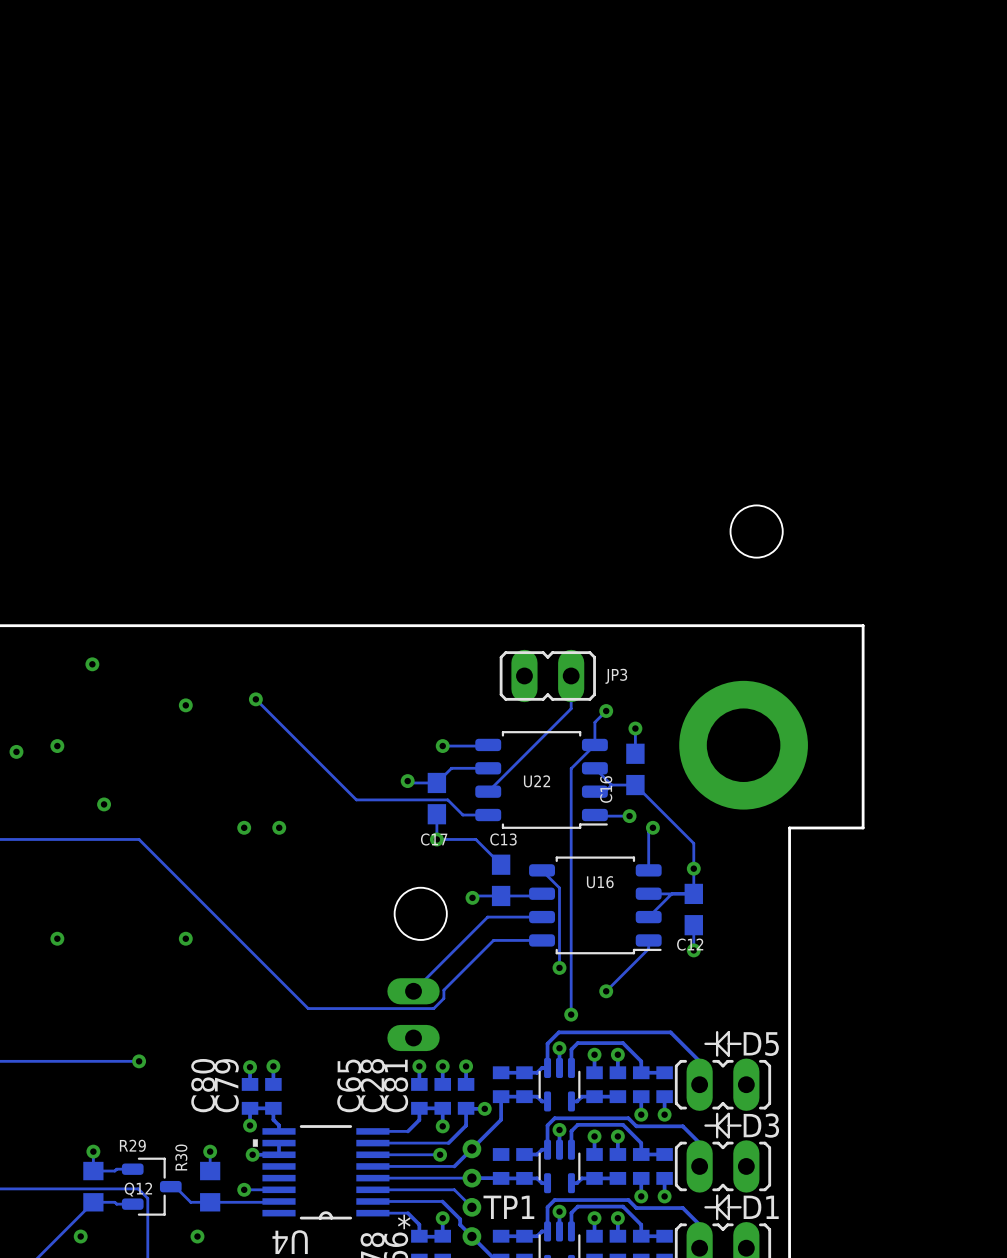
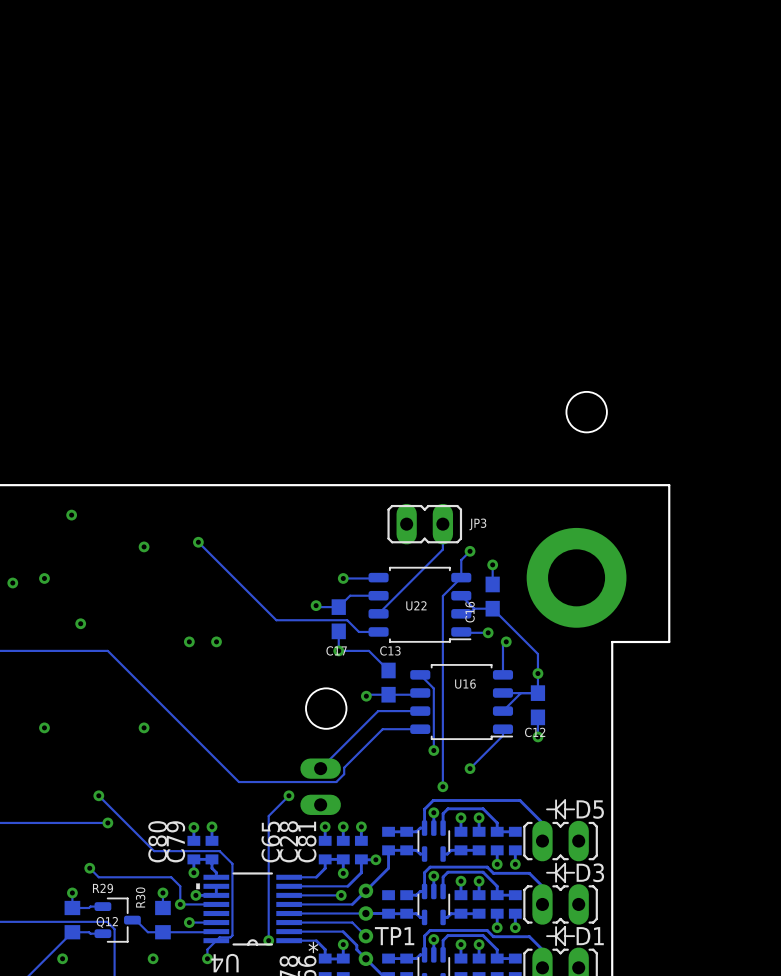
track: none -> (98, 795) (154, 851) (219, 851) (232, 863) (232, 935) (230, 937) (219, 937) (207, 949) (207, 958)
via: none -> (98, 795)
track: none -> (288, 795) (268, 816) (268, 940)
via: none -> (288, 795)
track: none -> (89, 868) (98, 877) (171, 877) (180, 886) (180, 904) (216, 904)
via: none -> (89, 868)
via: none -> (180, 904)
via: none -> (268, 940)
via: none -> (207, 958)

